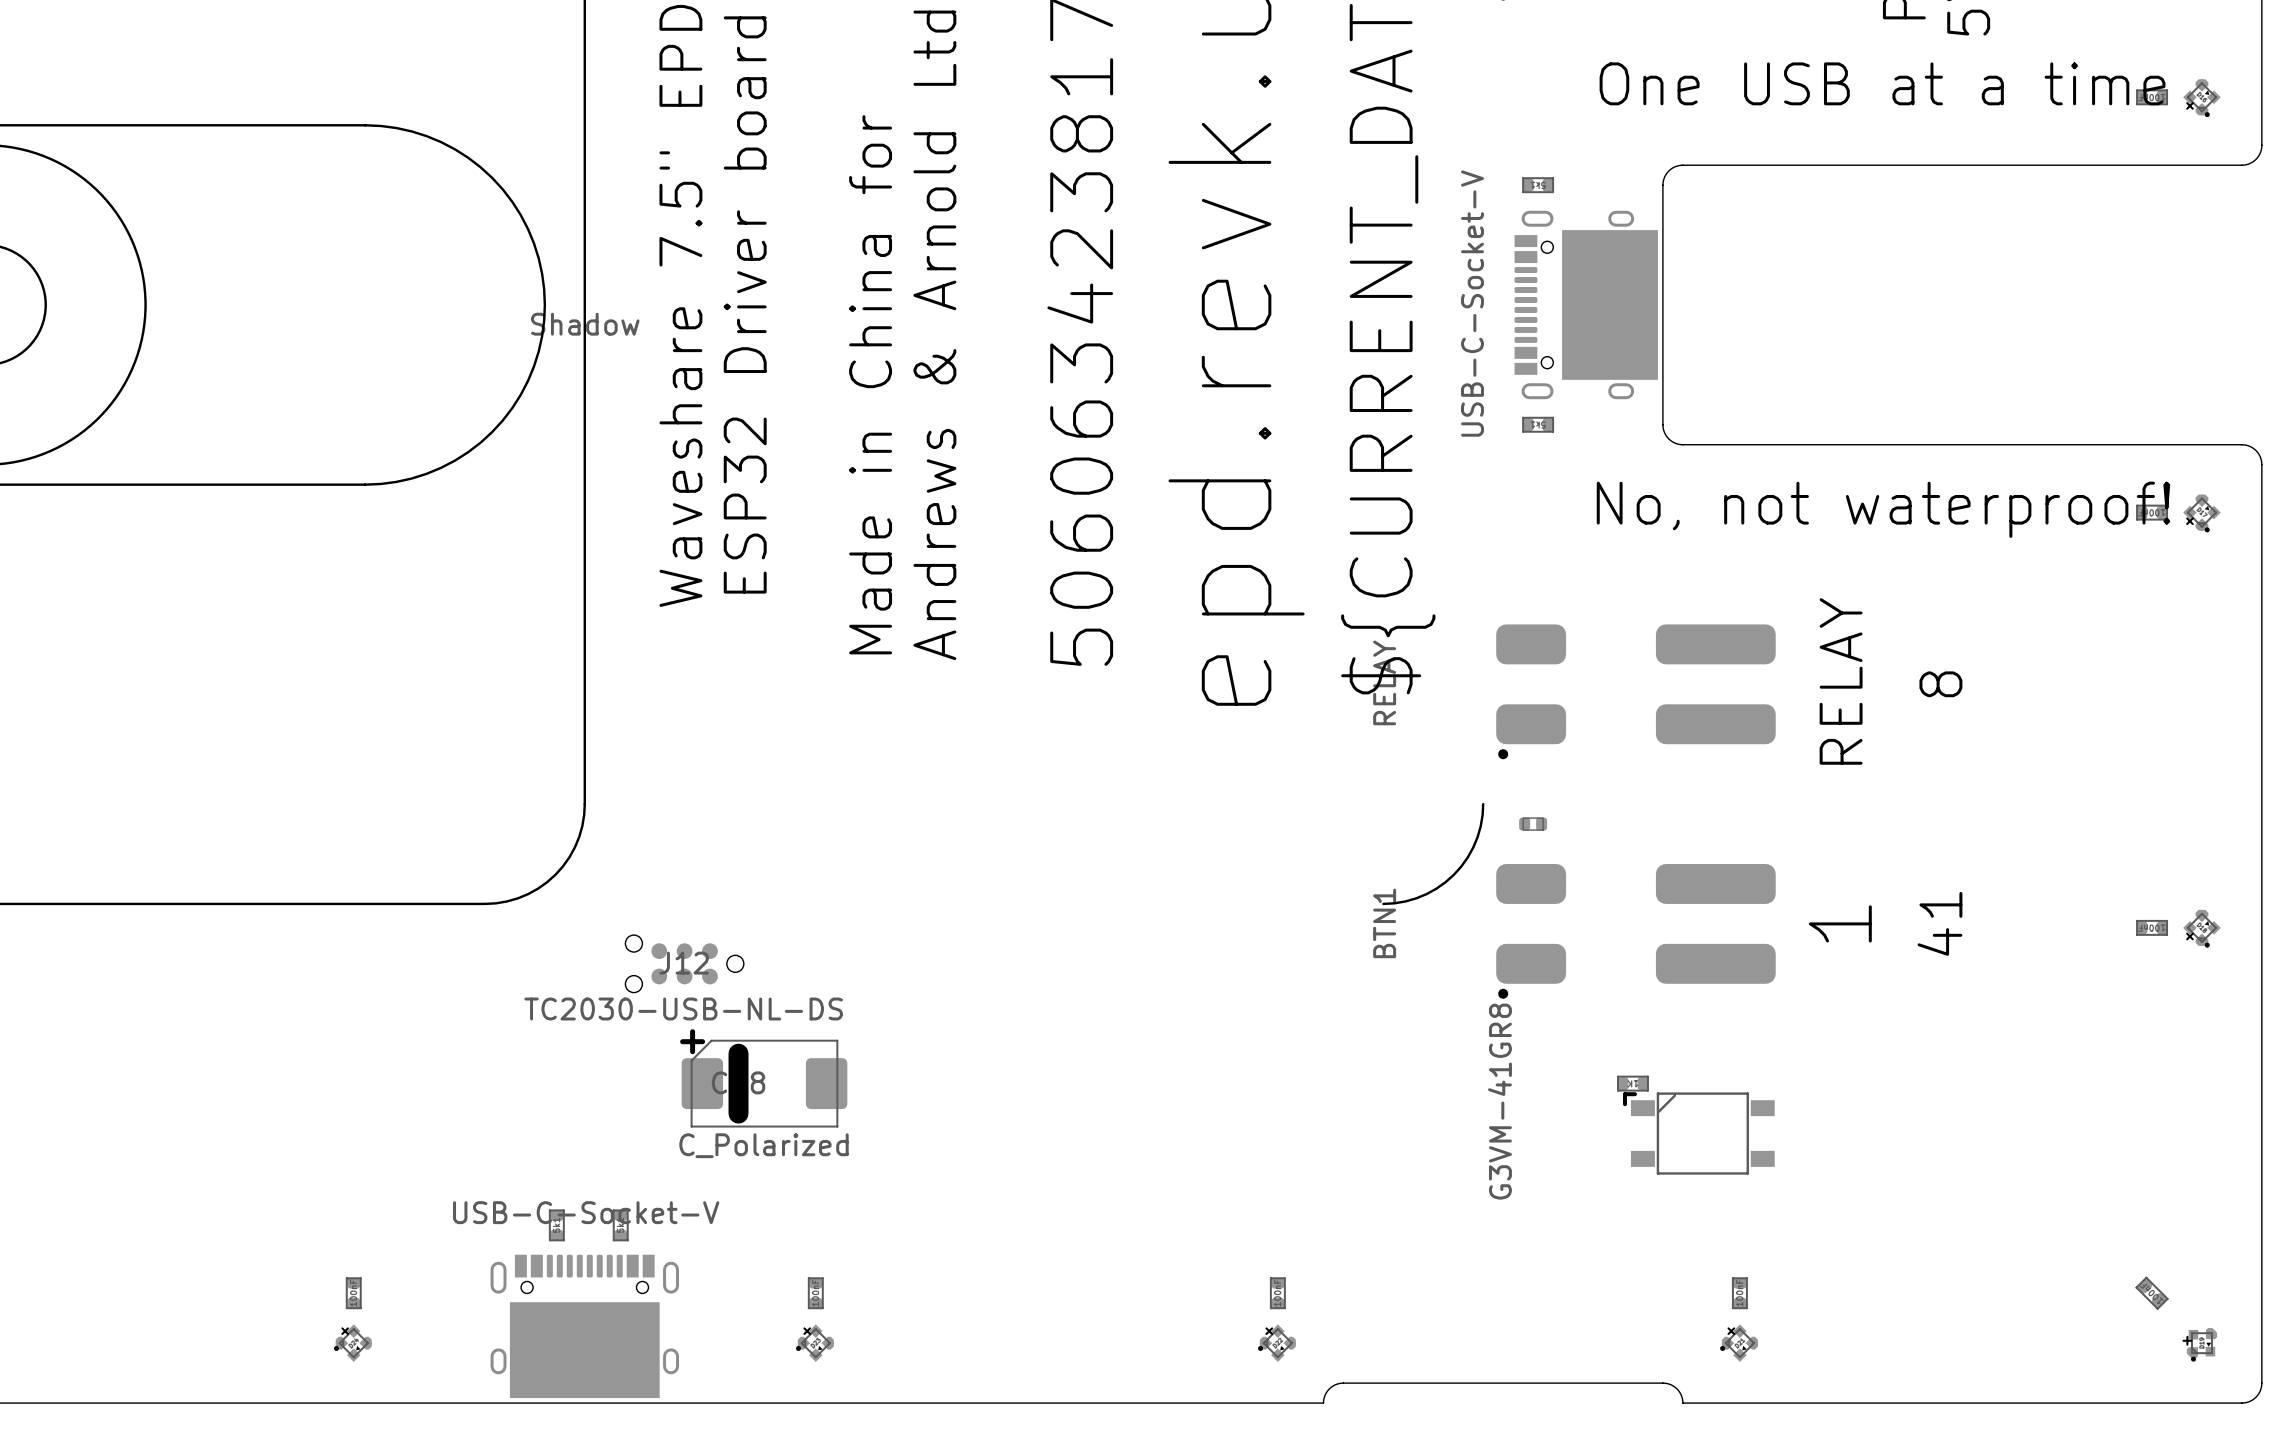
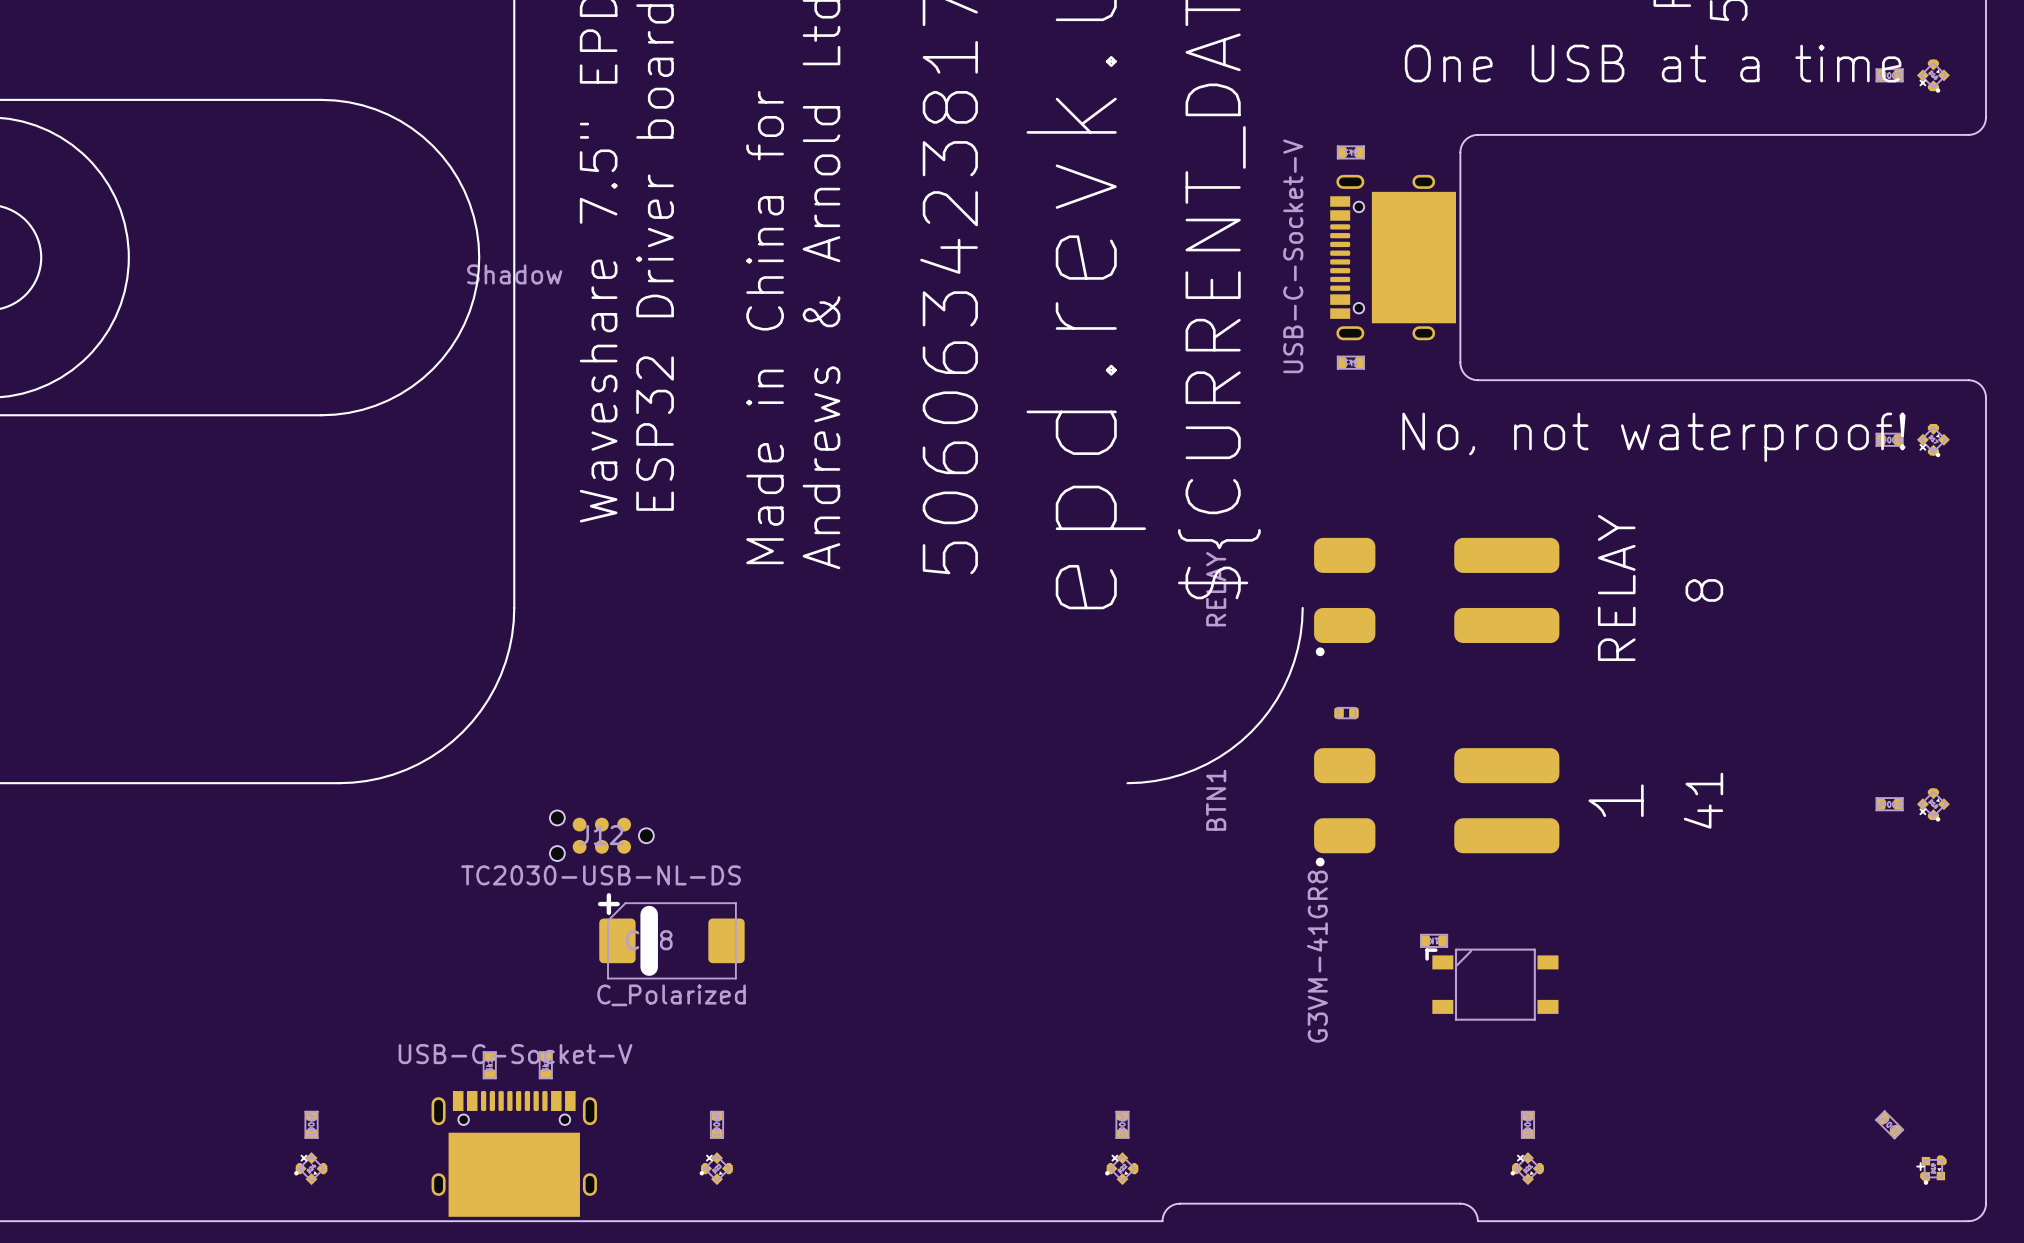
line: (584, 704) (584, 804) (582, 826) (574, 847) (555, 874) (538, 888) (507, 901) (484, 903) (385, 903) -> (514, 607) (509, 648) (500, 675) (488, 699) (462, 731) (430, 757) (406, 769) (366, 781) (339, 783)
line: none -> (1302, 607) (1297, 648) (1289, 675) (1269, 710) (1251, 731) (1230, 749) (1194, 769) (1168, 778) (1127, 783)
line: (1483, 804) (1477, 837) (1467, 857) (1453, 874) (1426, 894) (1405, 901) (1383, 903) -> none

